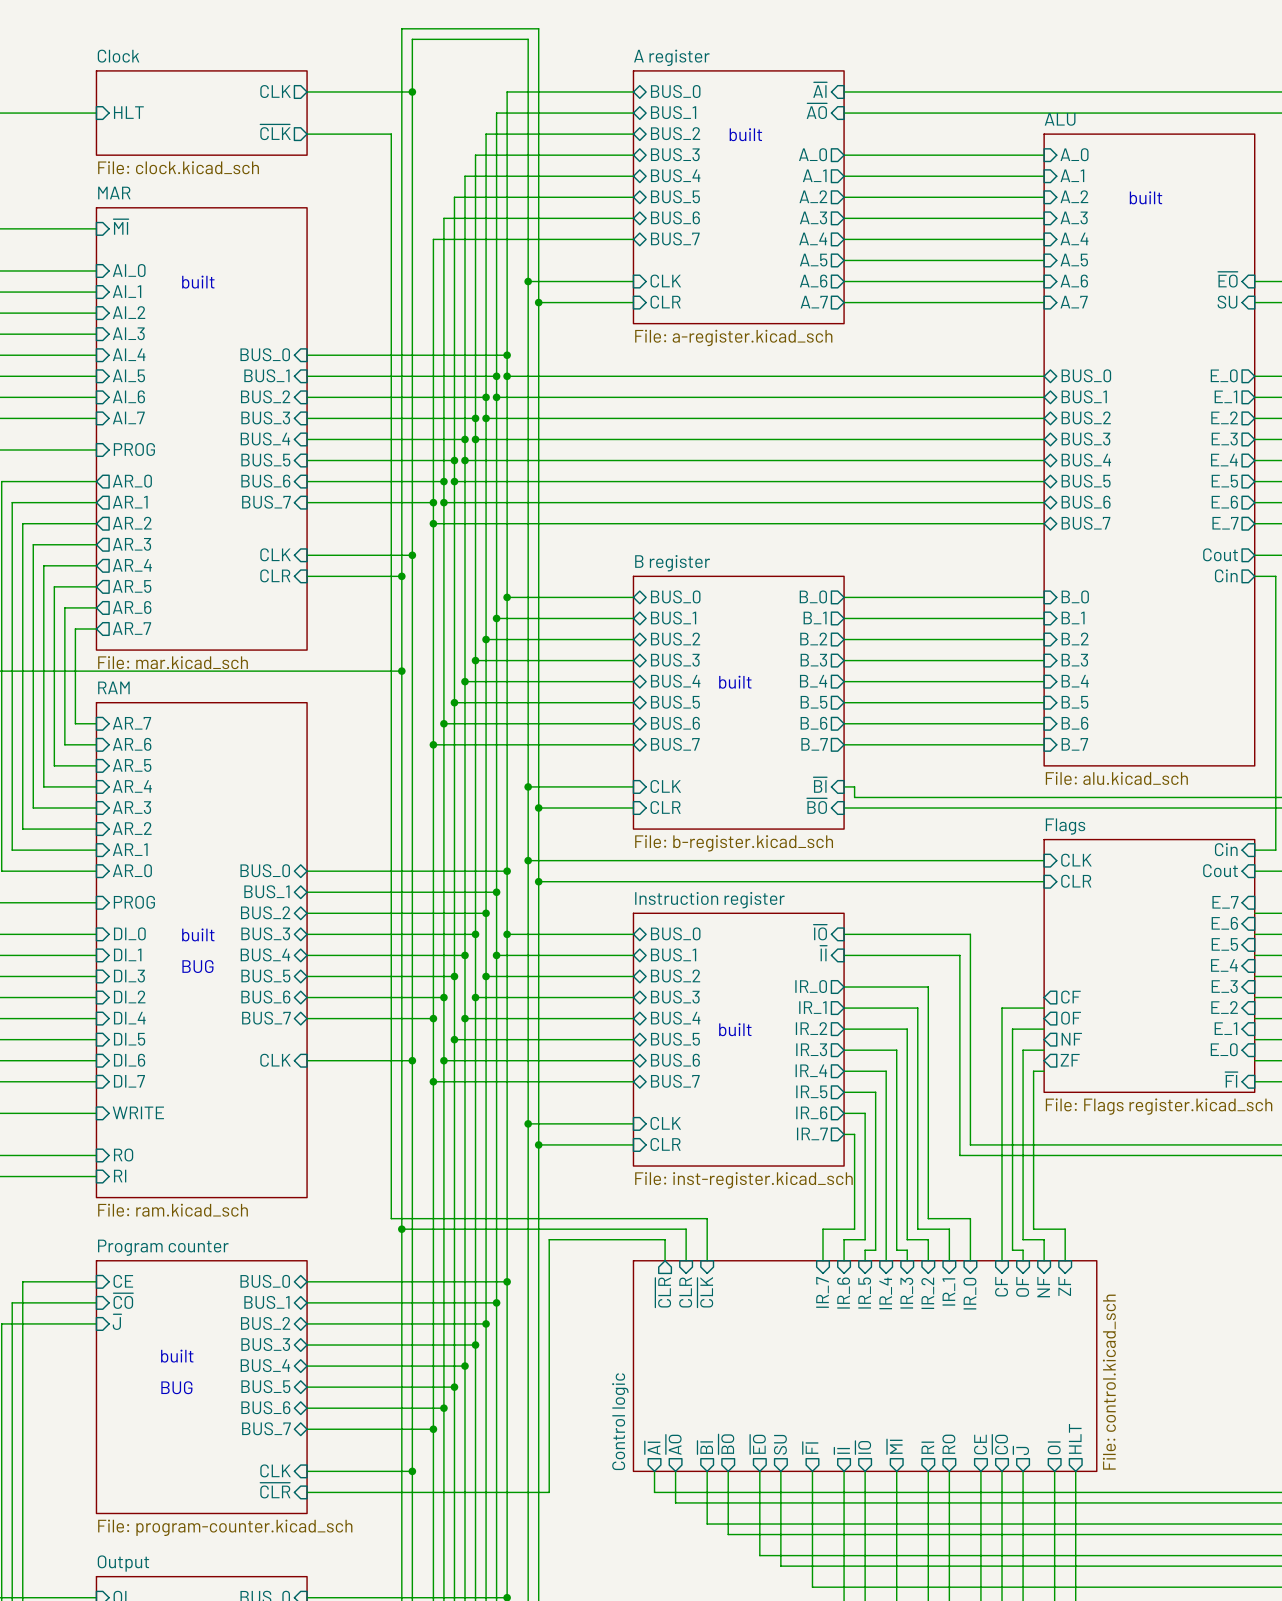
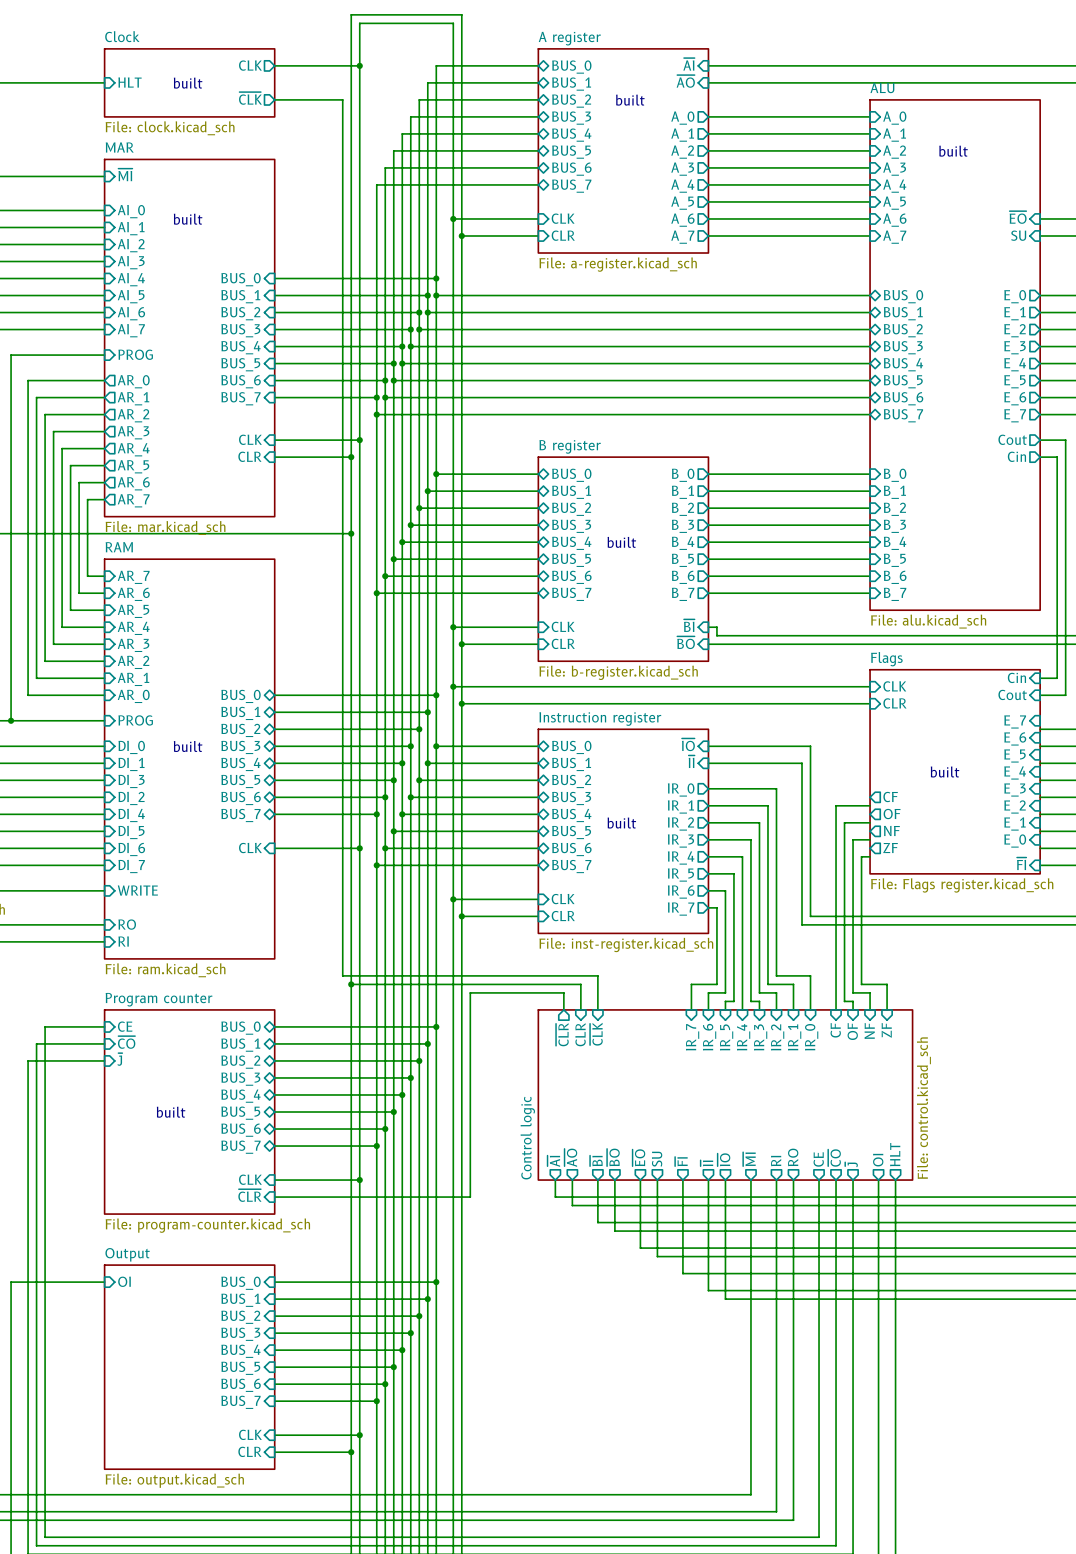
text: none -> built (188, 83)
text: BUG (197, 966) -> none
text: none -> built (945, 772)
text: built (177, 1356) -> none
text: BUG (176, 1387) -> built (171, 1112)

